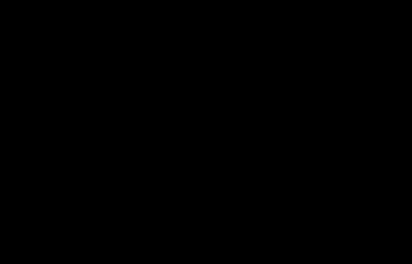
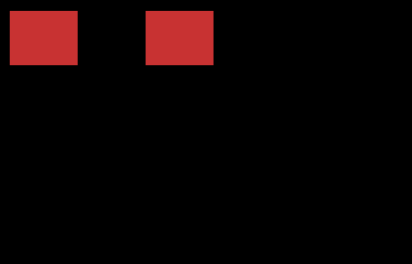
part: none -> (111, 38)

